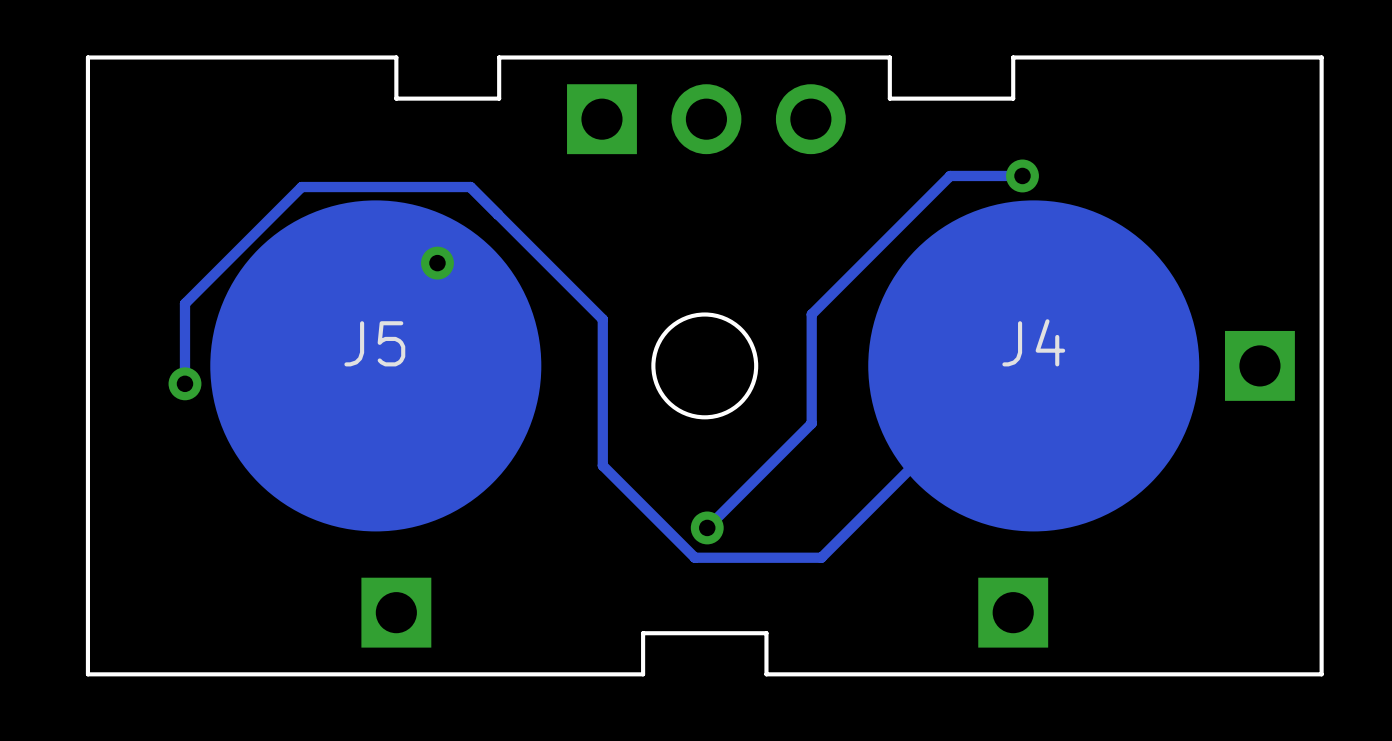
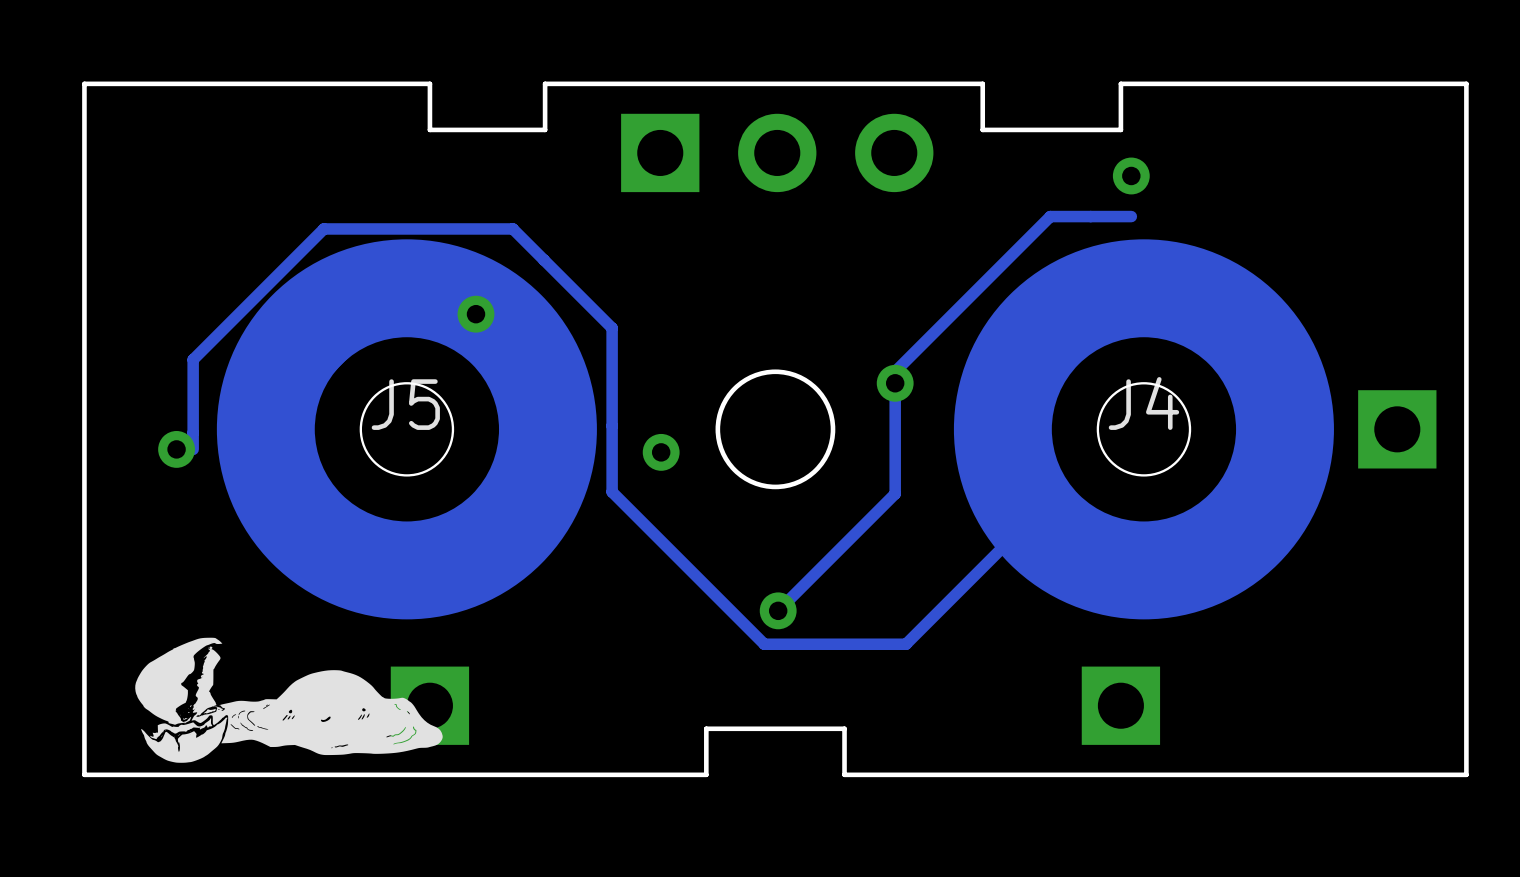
via position: (1022, 175) -> (1131, 175)
J5 footprint: [210, 200, 542, 532] -> [216, 239, 597, 620]
J4 footprint: [868, 200, 1200, 532] -> [953, 239, 1334, 620]
track: (559, 275) (602, 319) (602, 465) -> (612, 328) (612, 492) (661, 541)
via: none -> (895, 383)
via position: (184, 383) -> (176, 449)
via: none -> (661, 452)
drawing: none -> [135, 637, 443, 763]

